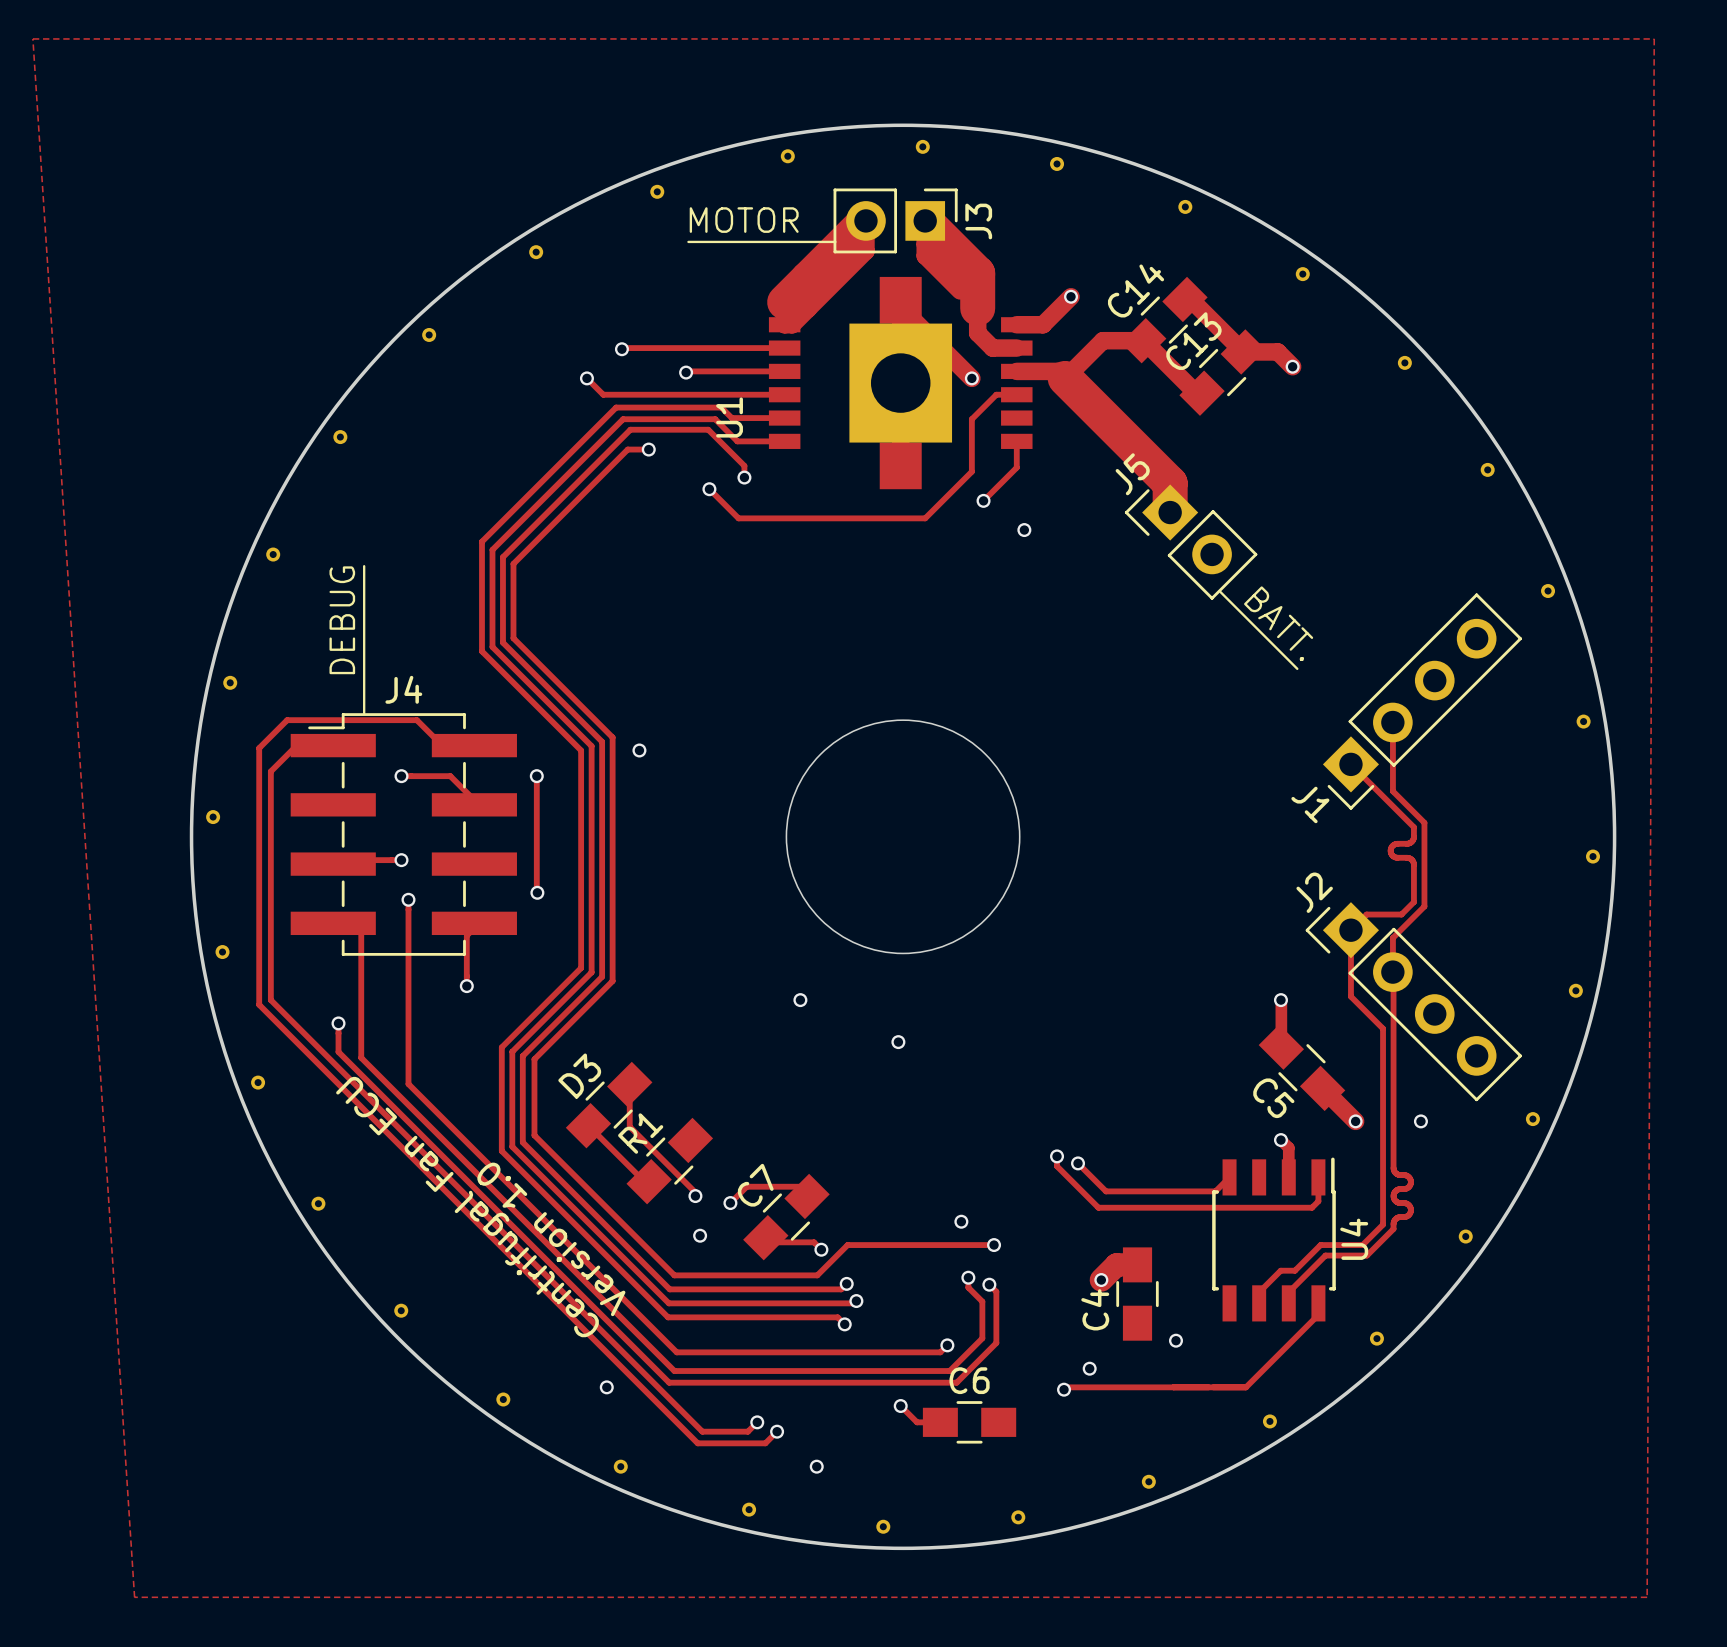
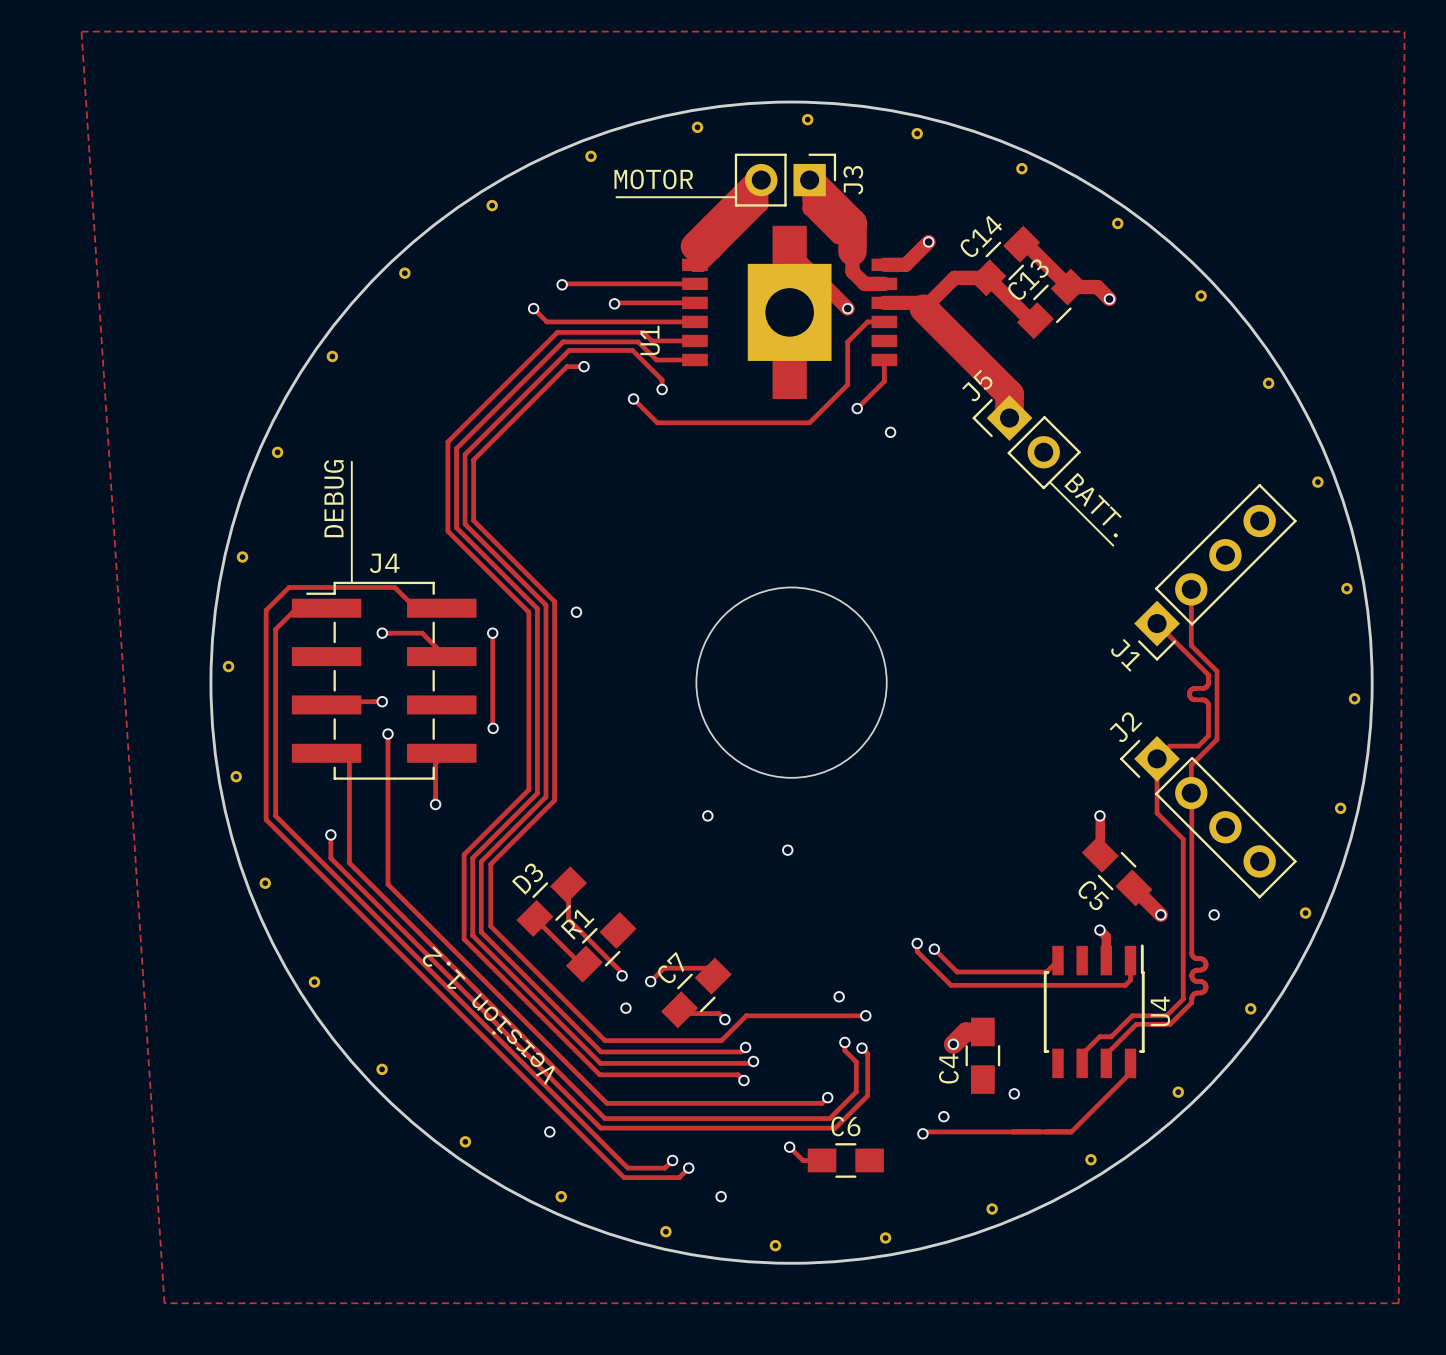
text: Centrifugal Fan ECU (467, 1207) -> none
text: Version 1.0 (551, 1239) -> Version 1.2 (488, 1015)

